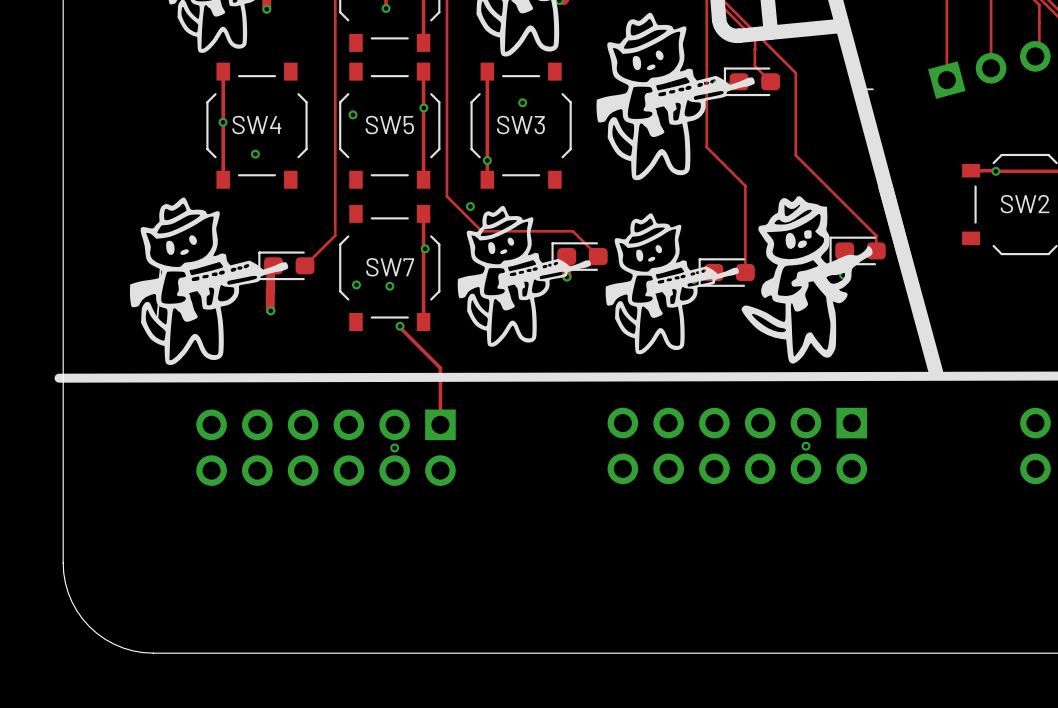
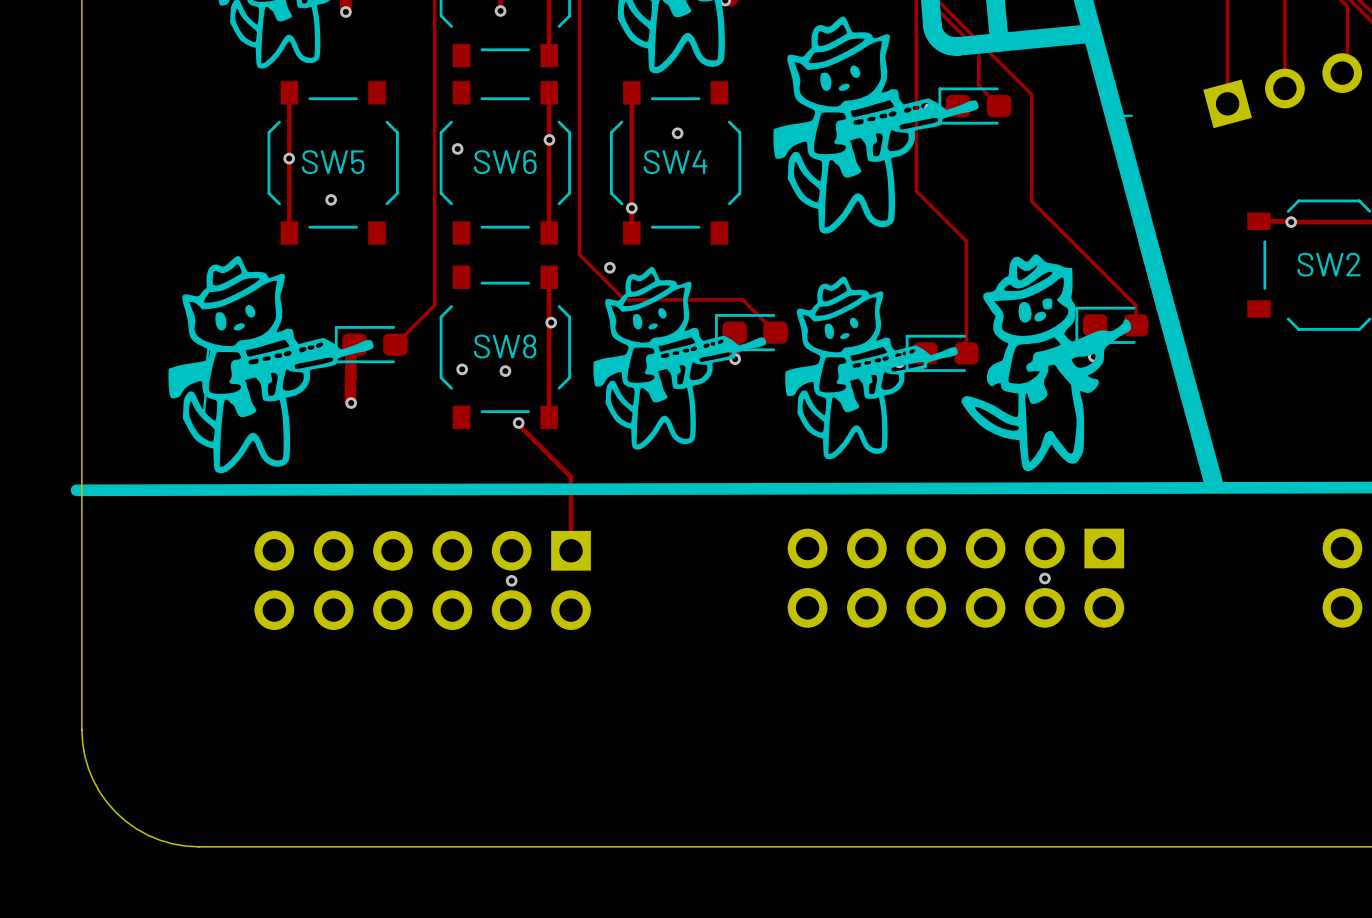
SW4 name: SW4 (256, 125) -> SW5 (333, 162)
SW5 name: SW5 (389, 125) -> SW6 (505, 162)
SW3 name: SW3 (520, 125) -> SW4 (675, 162)
SW7 name: SW7 (390, 267) -> SW8 (505, 346)

